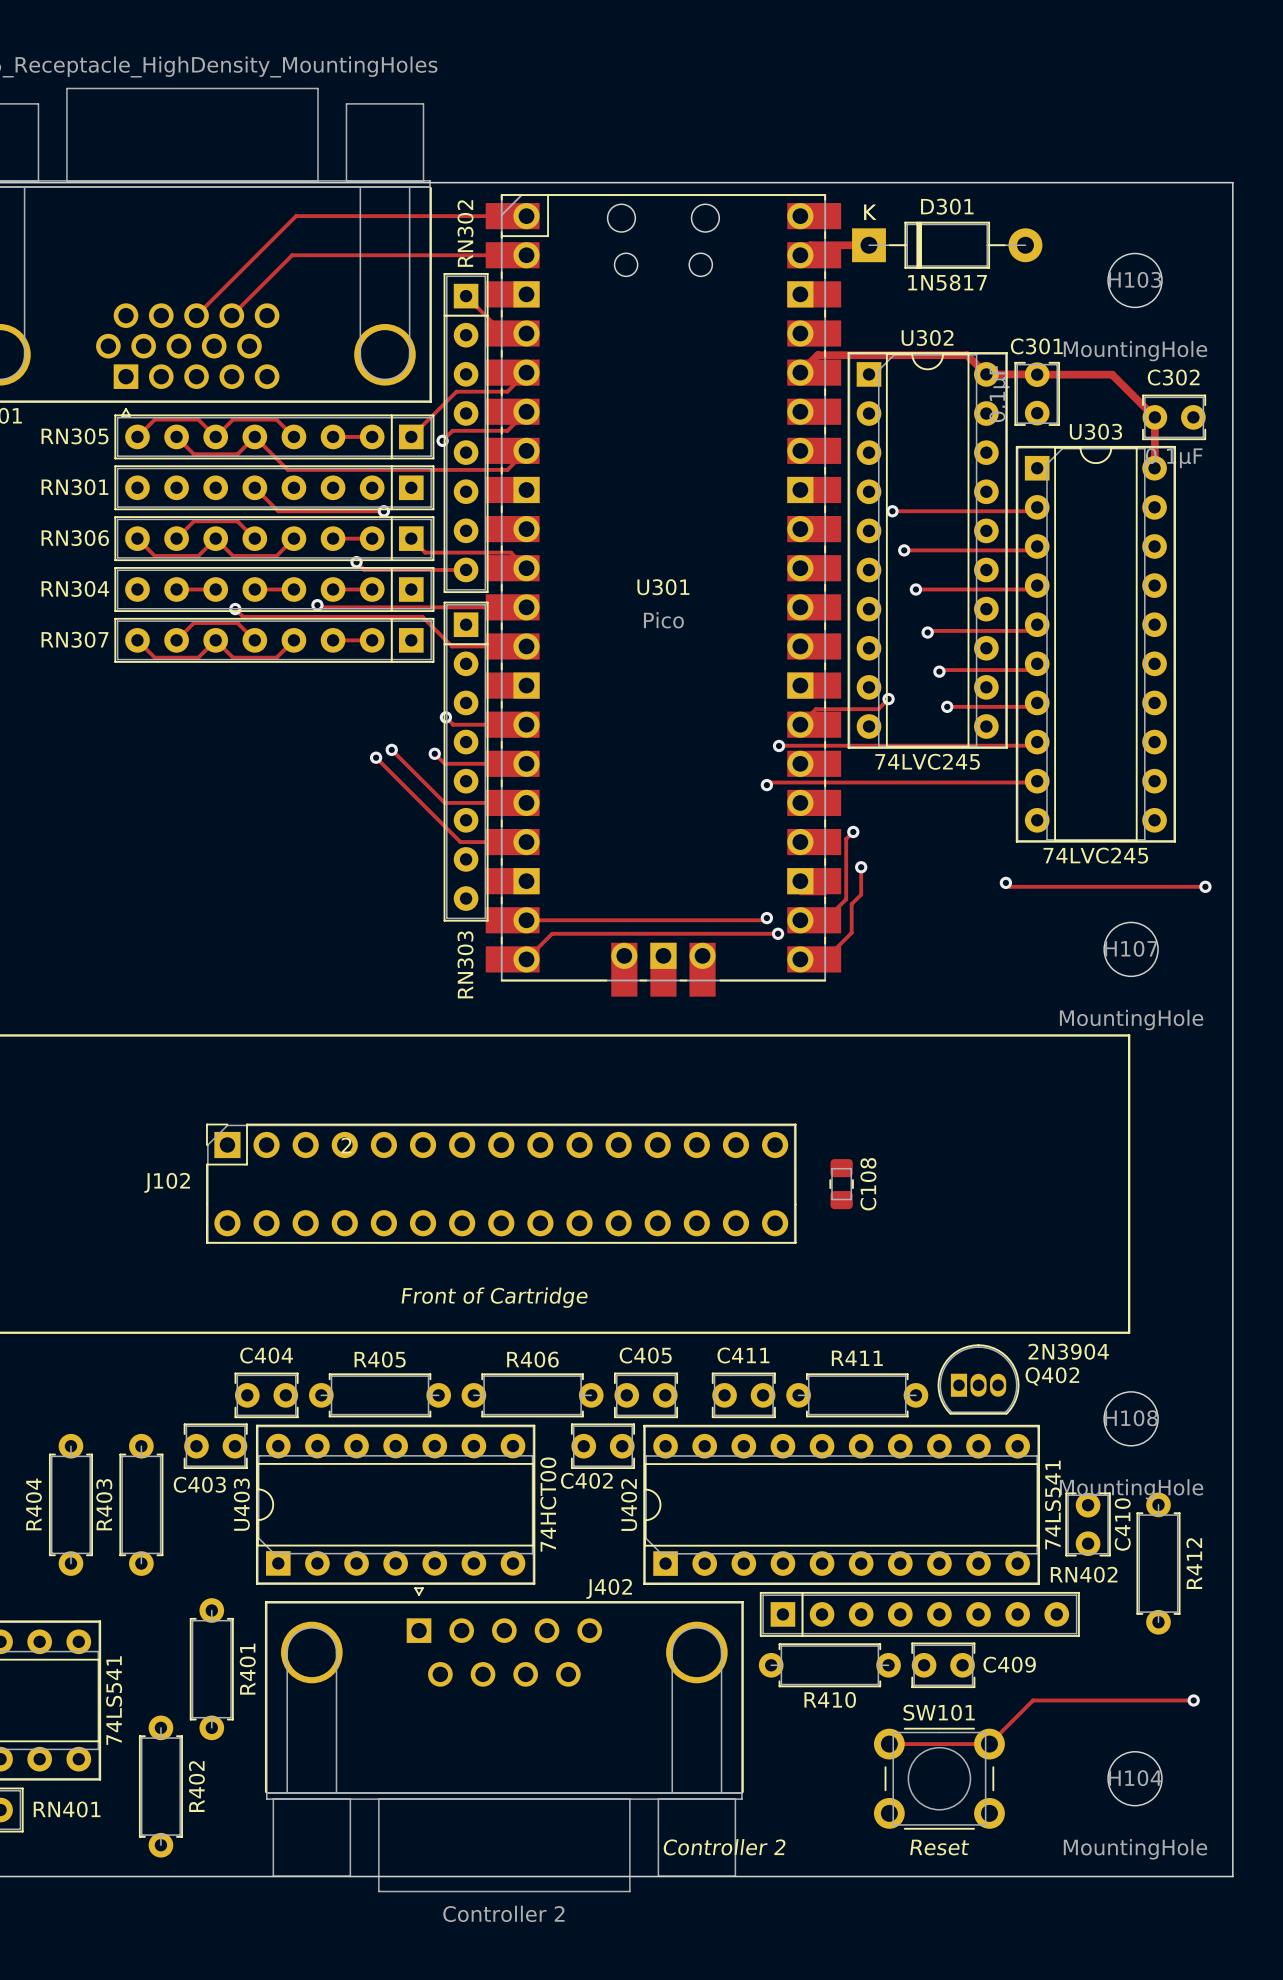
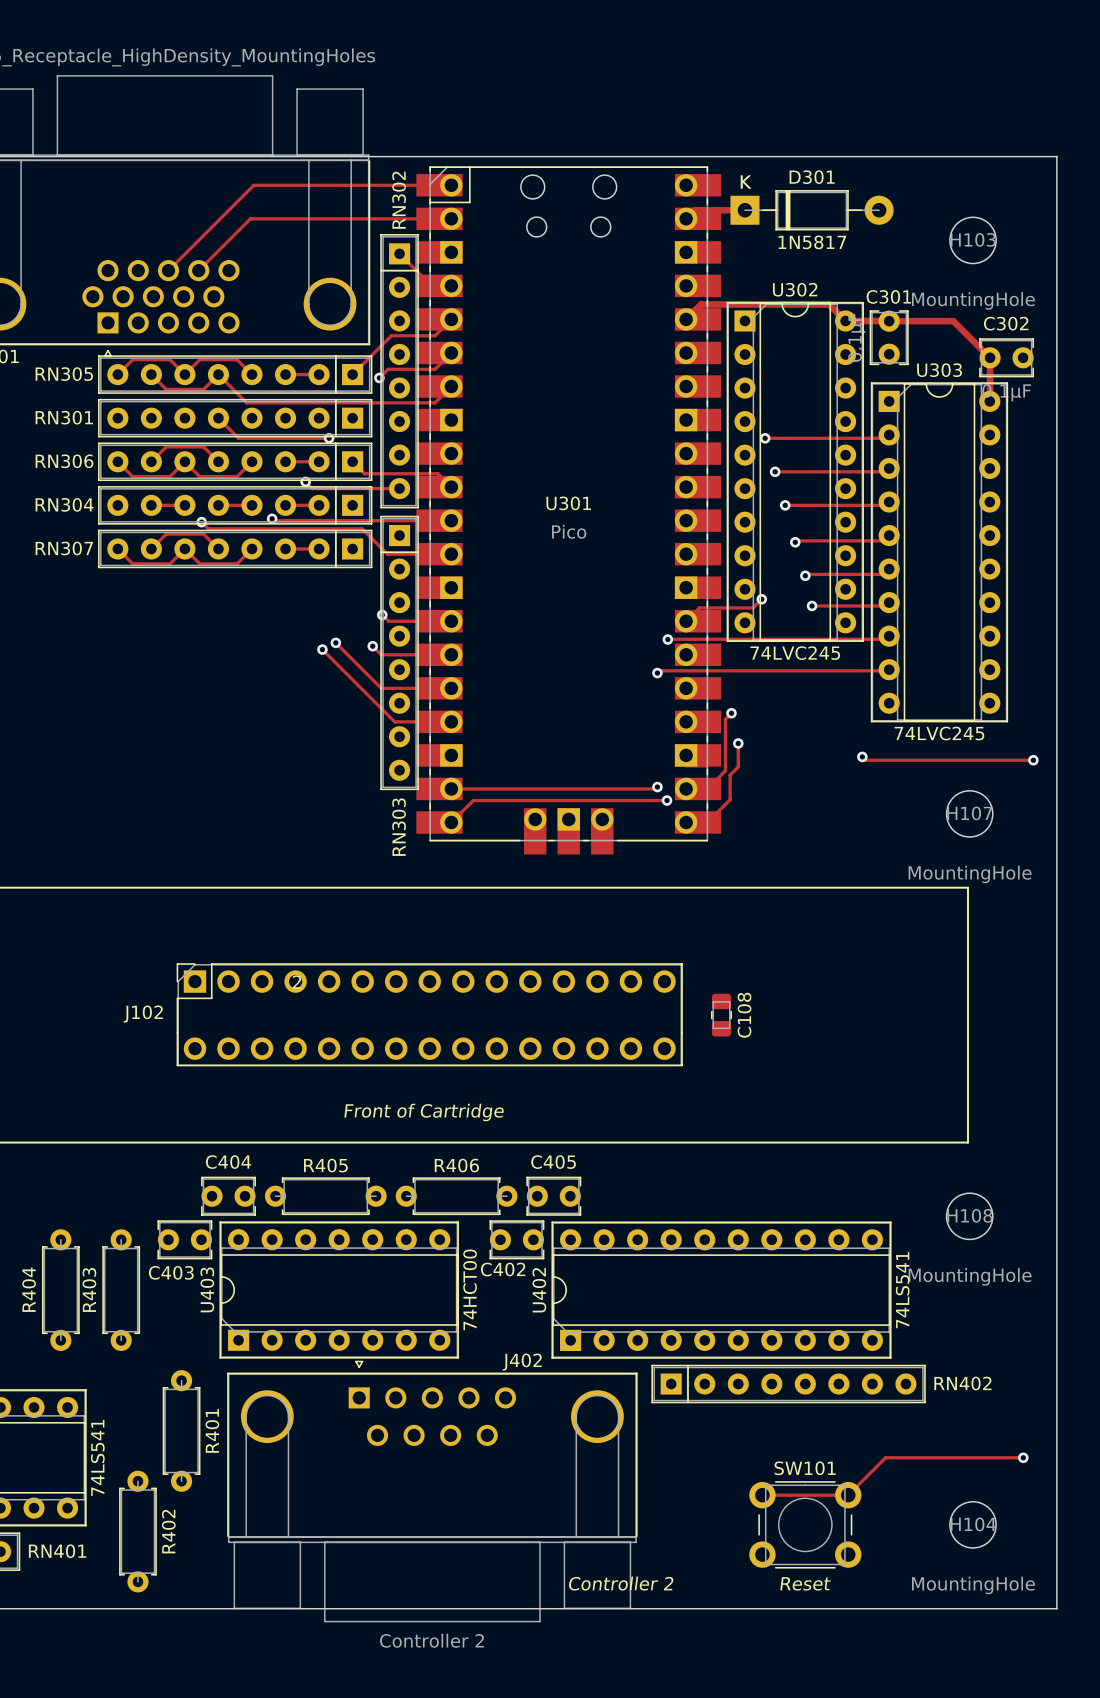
Q402: 2N3904 (978, 1379) -> none
C411: (743, 1395) -> none
R411: (857, 1395) -> none
C410: (1088, 1524) -> none
R412: (1158, 1563) -> none
RN402 name position: RN402 (1084, 1574) -> RN402 (962, 1383)
R410: (829, 1665) -> none
C409: (943, 1665) -> none

